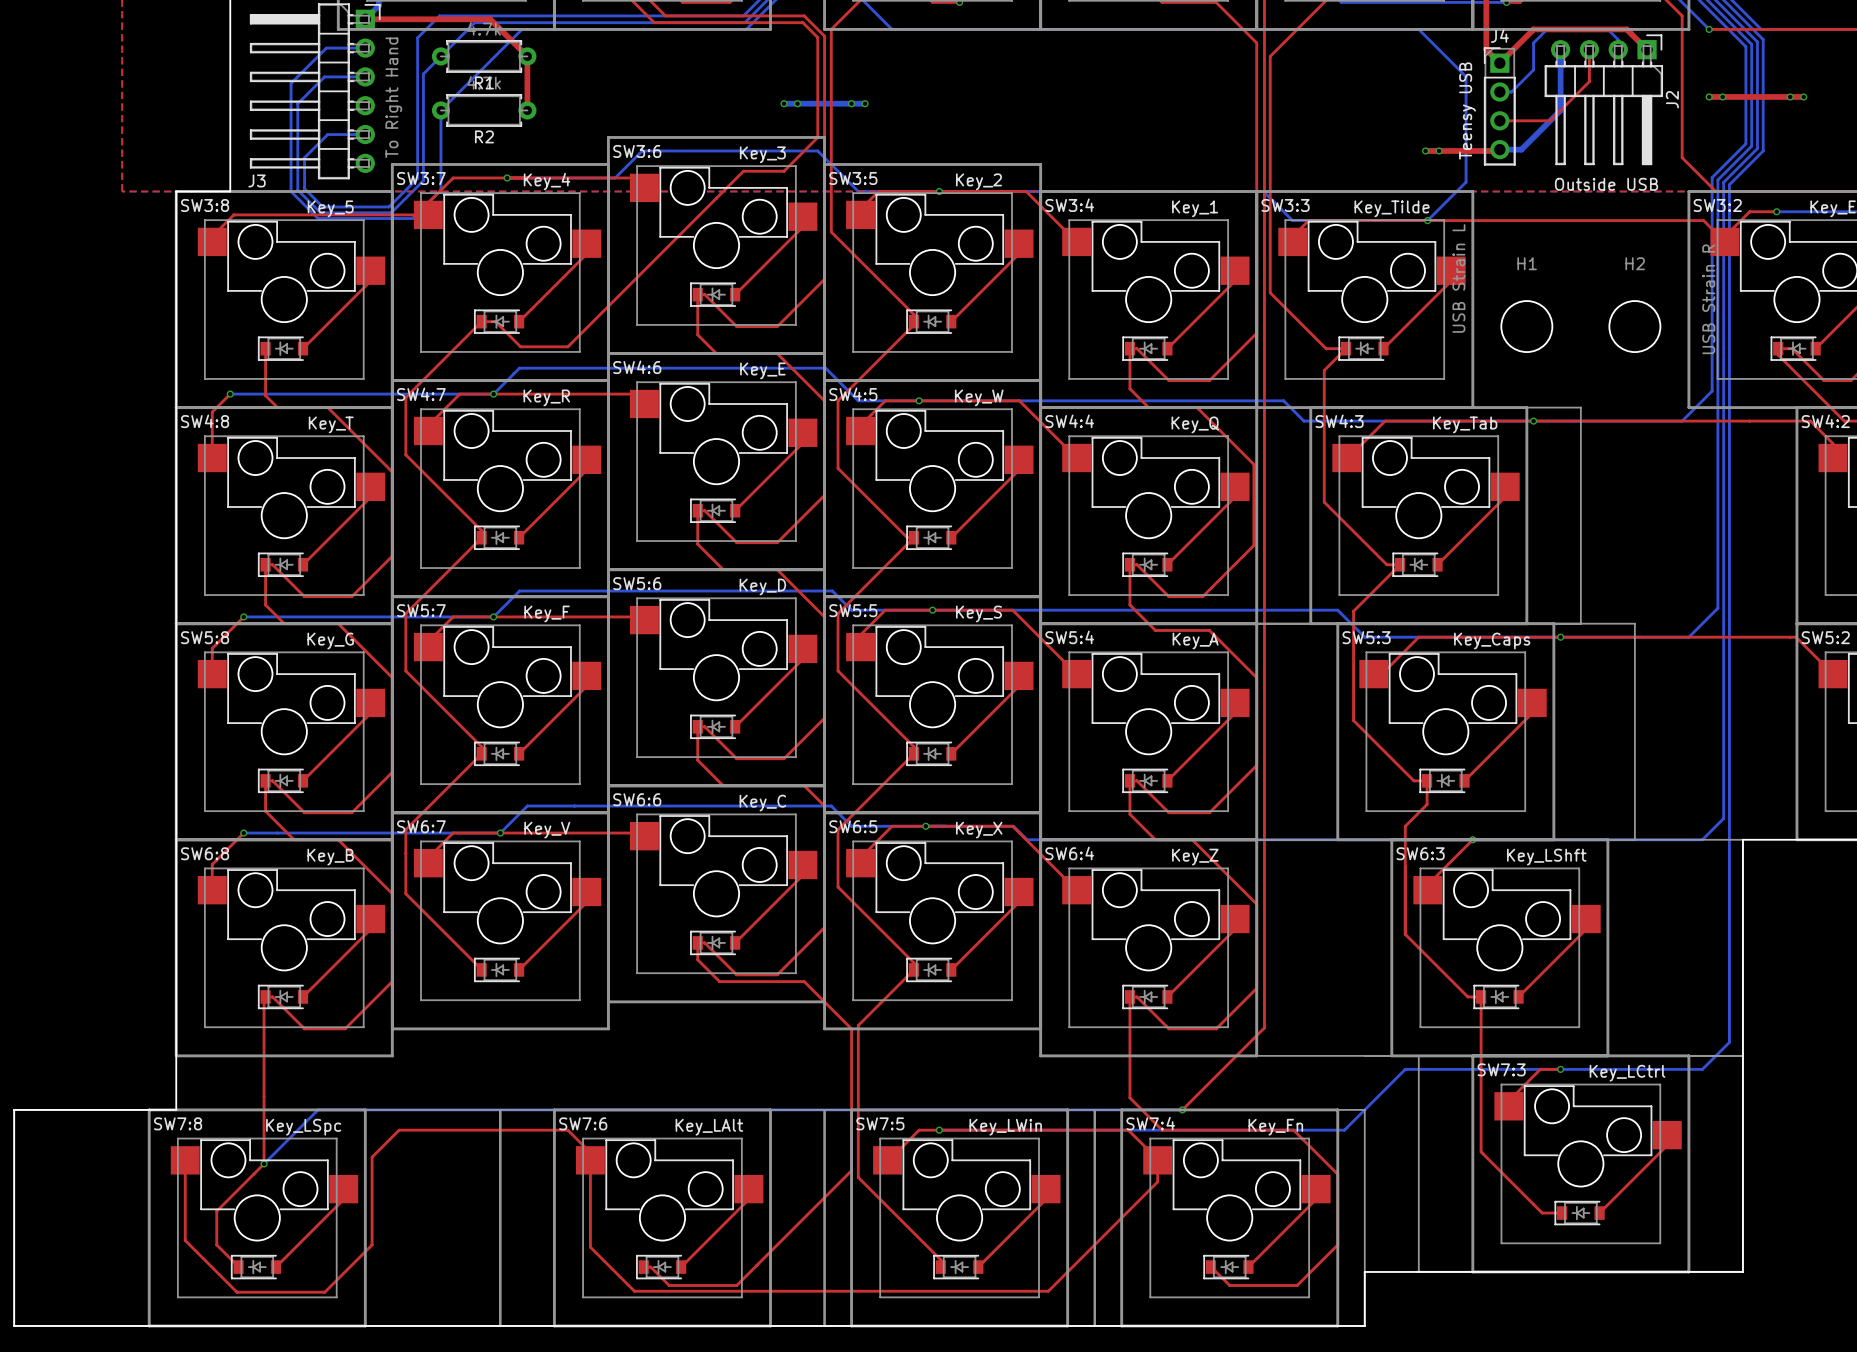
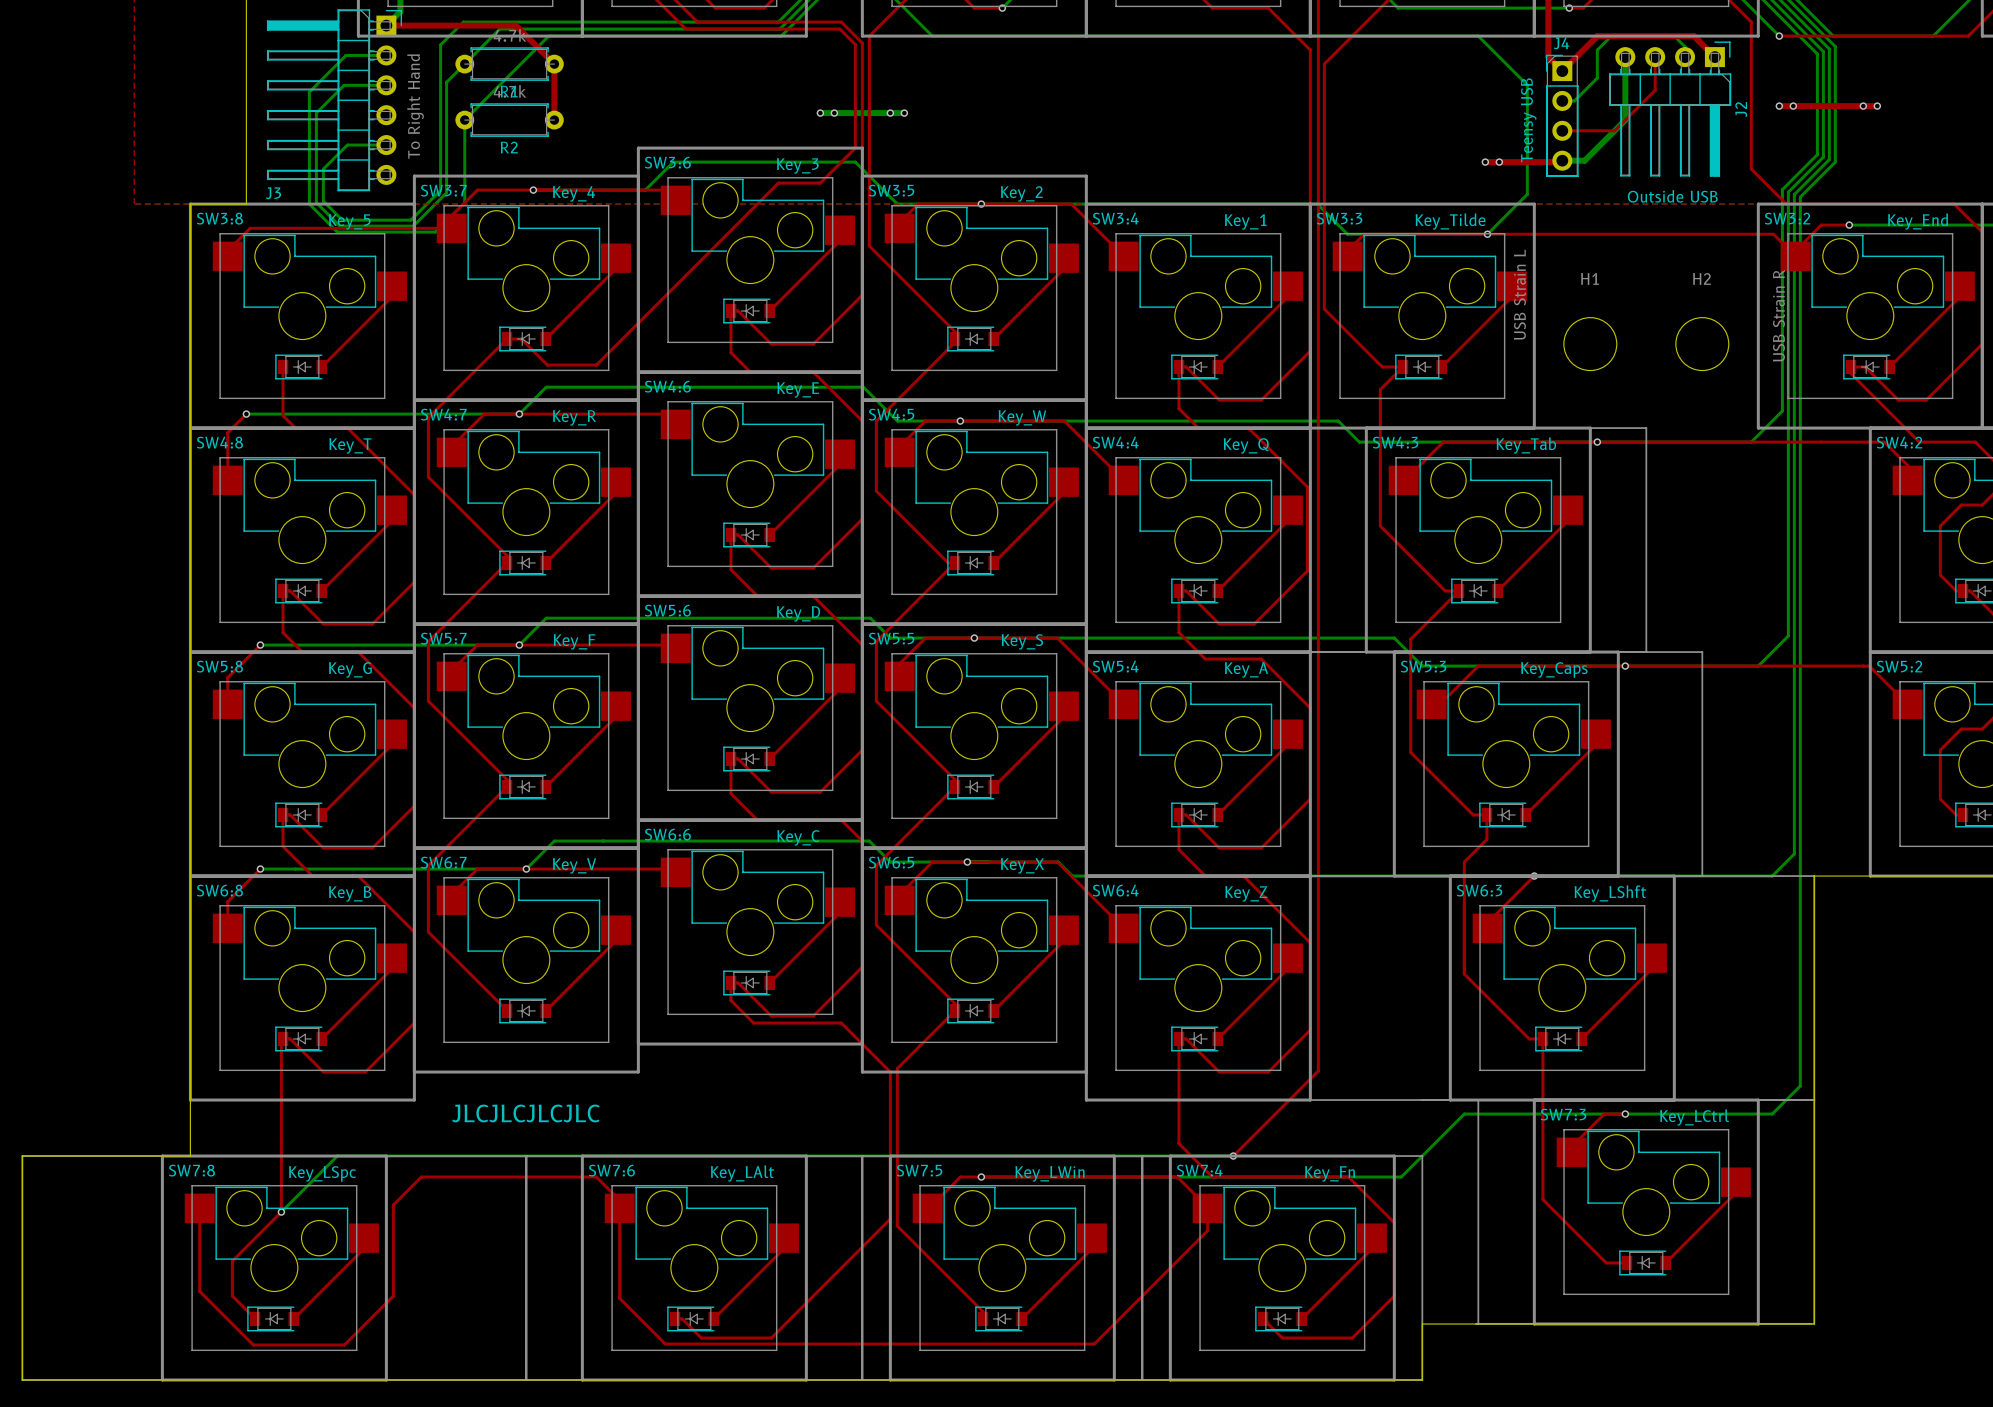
text: none -> JLCJLCJLCJLC (525, 1113)

